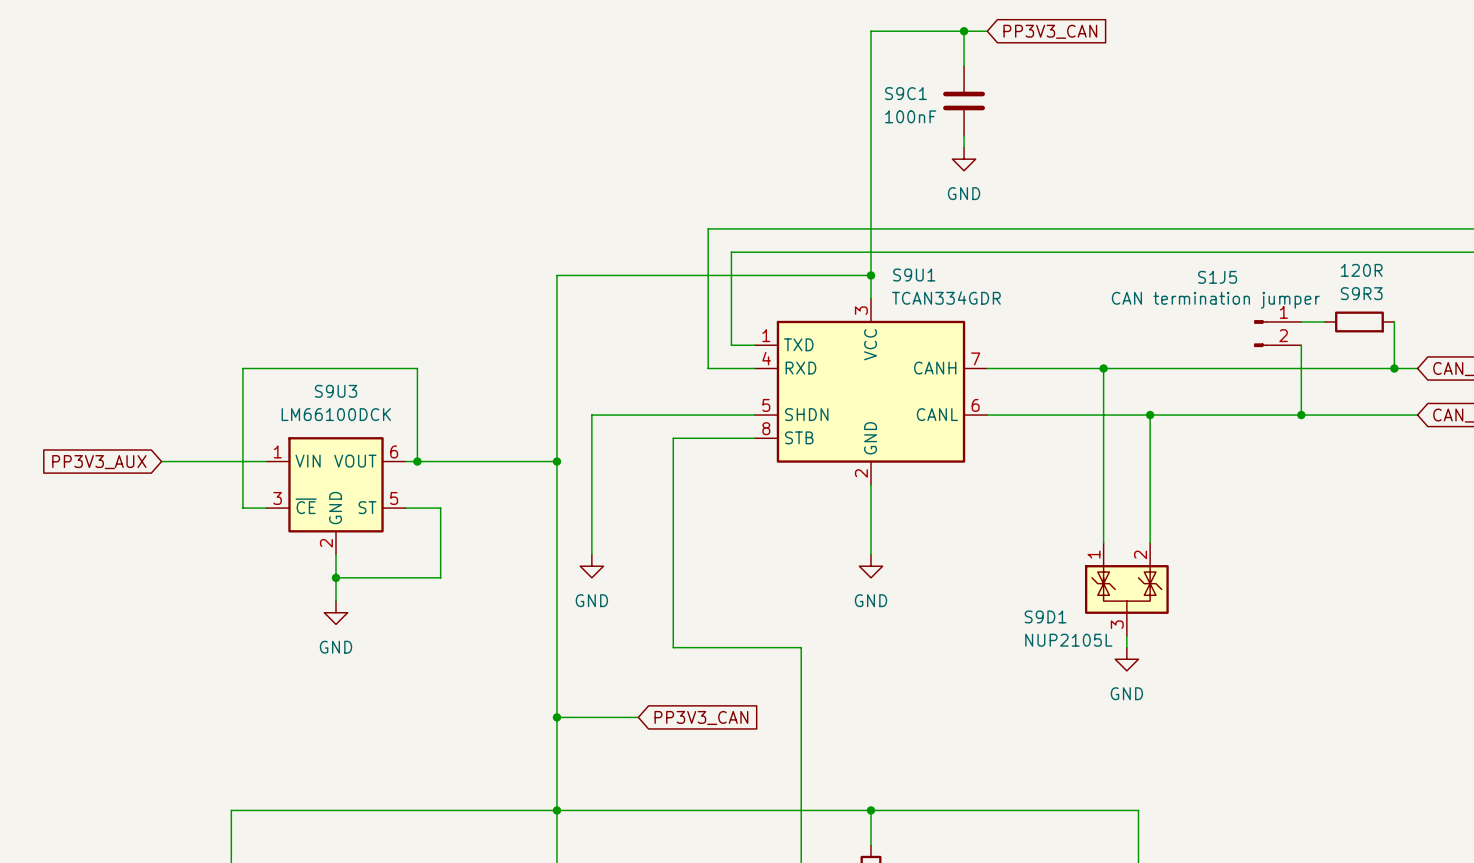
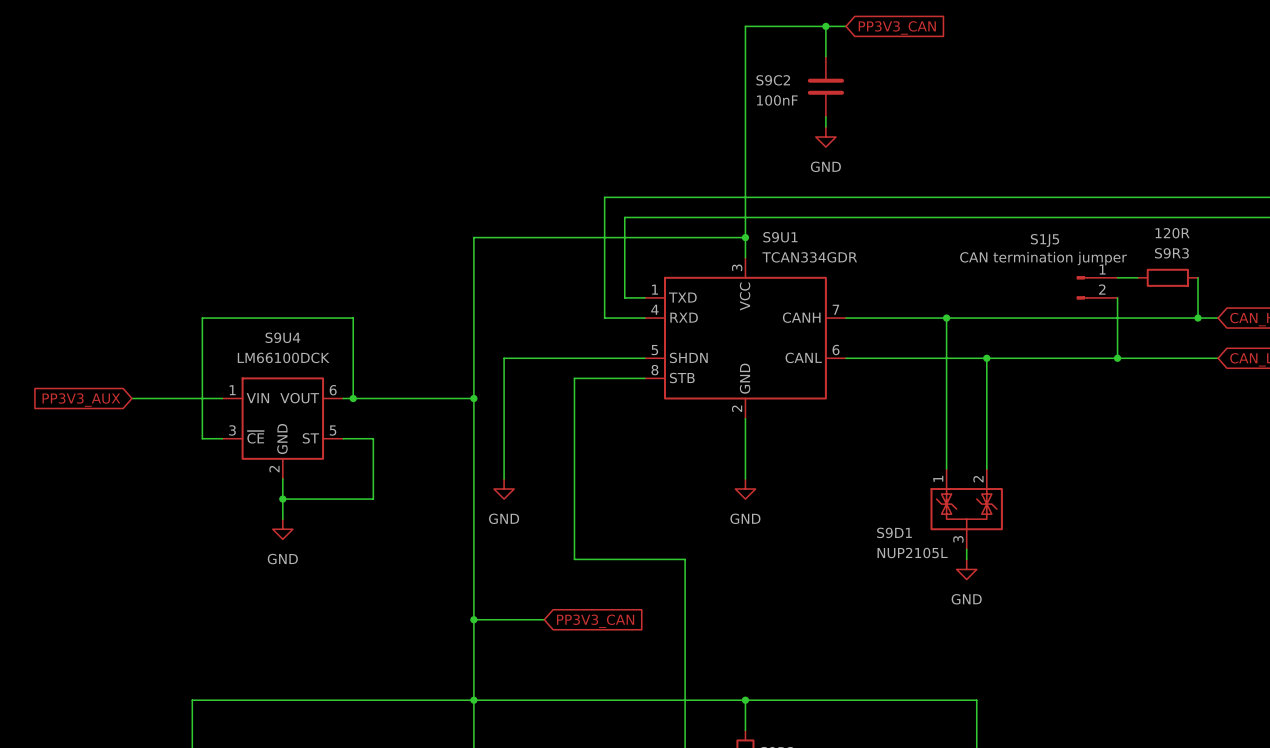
S9C1 name: S9C1 (905, 93) -> S9C2 (773, 80)
S9U3 name: S9U3 (336, 391) -> S9U4 (282, 337)

